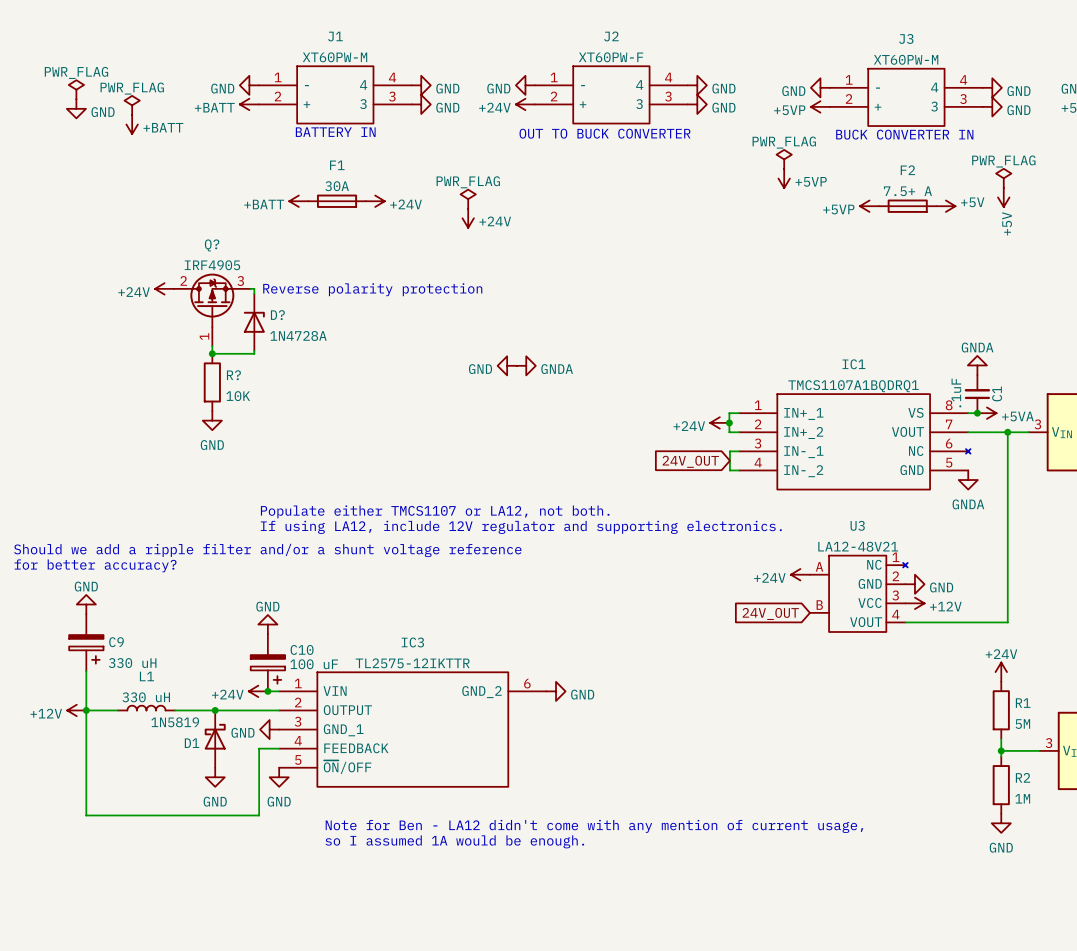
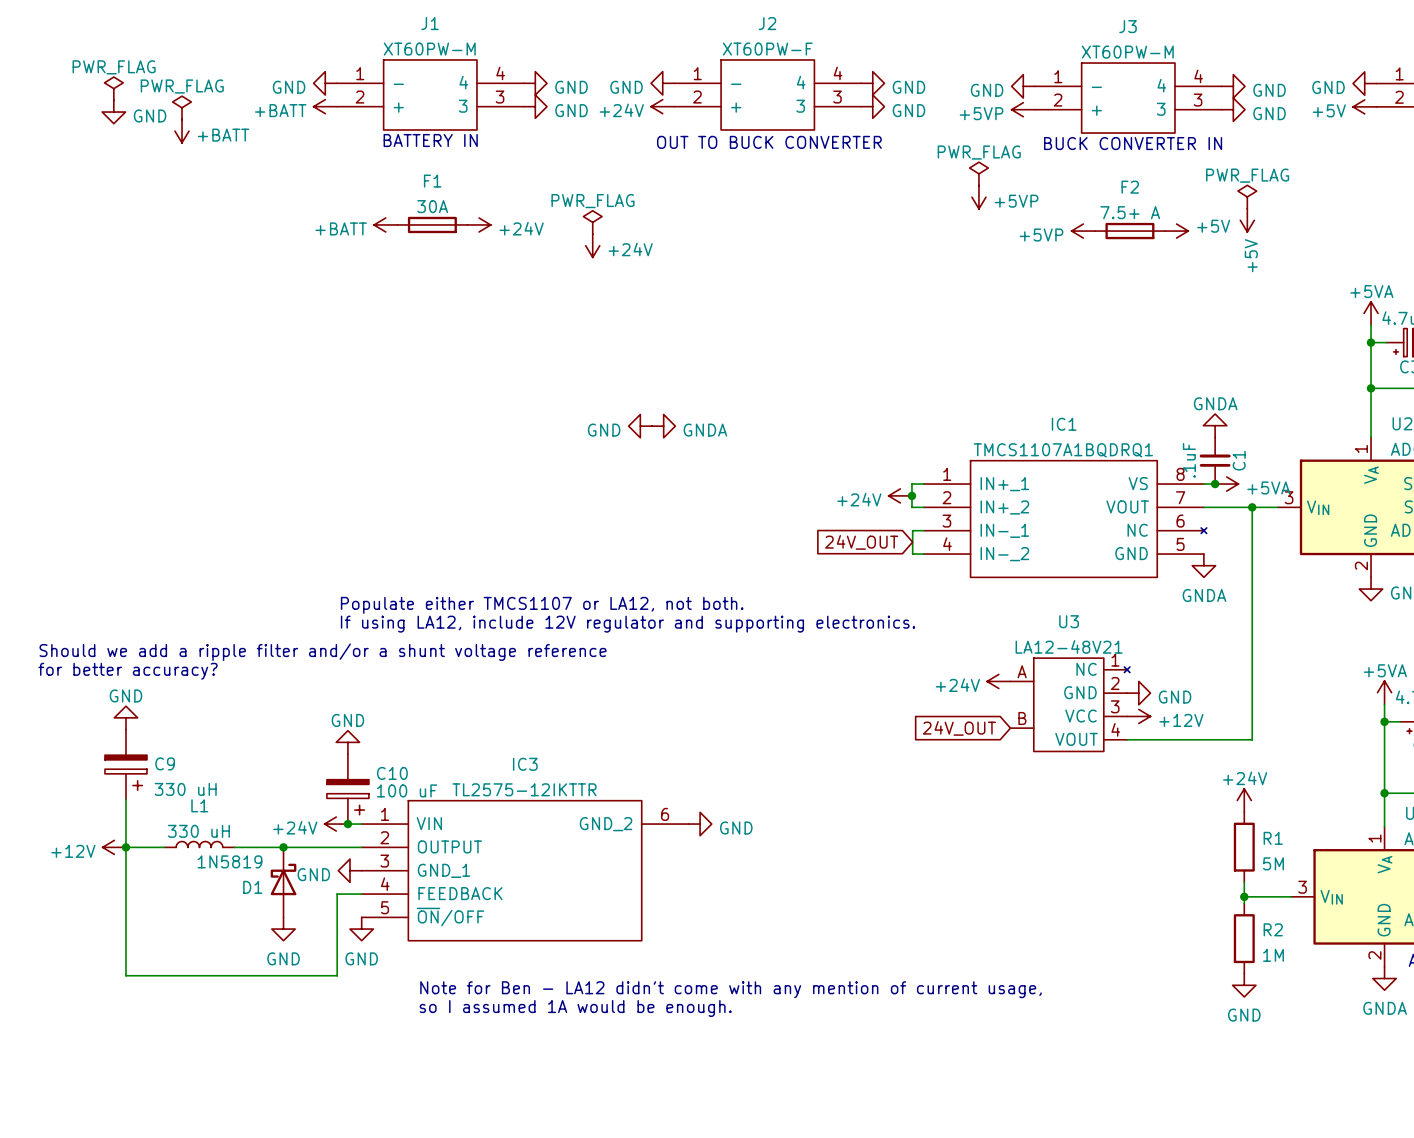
power symbol: +24V (164, 288) -> none
wire: (250, 288) (254, 288) (254, 293) -> none
text: Reverse polarity protection (372, 289) -> none
Q?: IRF4905 (212, 309) -> none
D?: 1N4728A (254, 322) -> none
wire: (212, 346) (212, 353) (254, 353) (254, 350) -> none
junction: (212, 353) -> none
R?: 10K (212, 382) -> none
power symbol: GND (212, 420) -> none

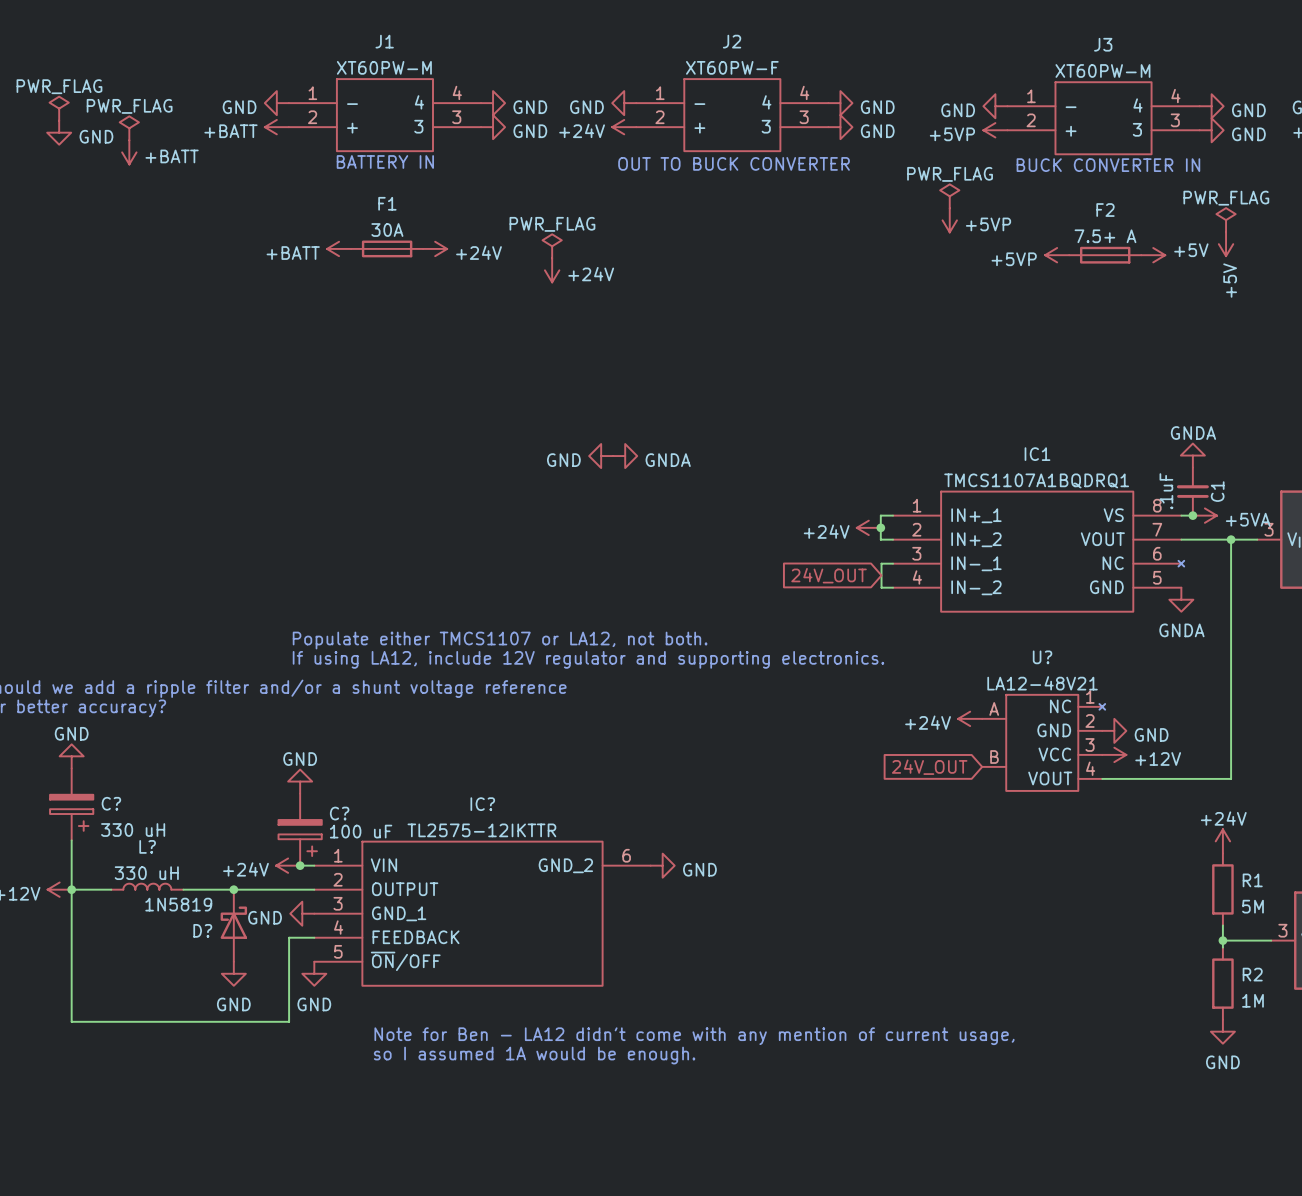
U3 name: U3 (1069, 621) -> U? (1042, 657)
C9 name: C9 (165, 763) -> C? (111, 803)
IC3 name: IC3 (525, 764) -> IC? (482, 804)
C10 name: C10 (392, 773) -> C? (339, 813)
L1 name: L1 (199, 805) -> L? (147, 846)
D1 name: D1 (252, 887) -> D? (202, 930)

